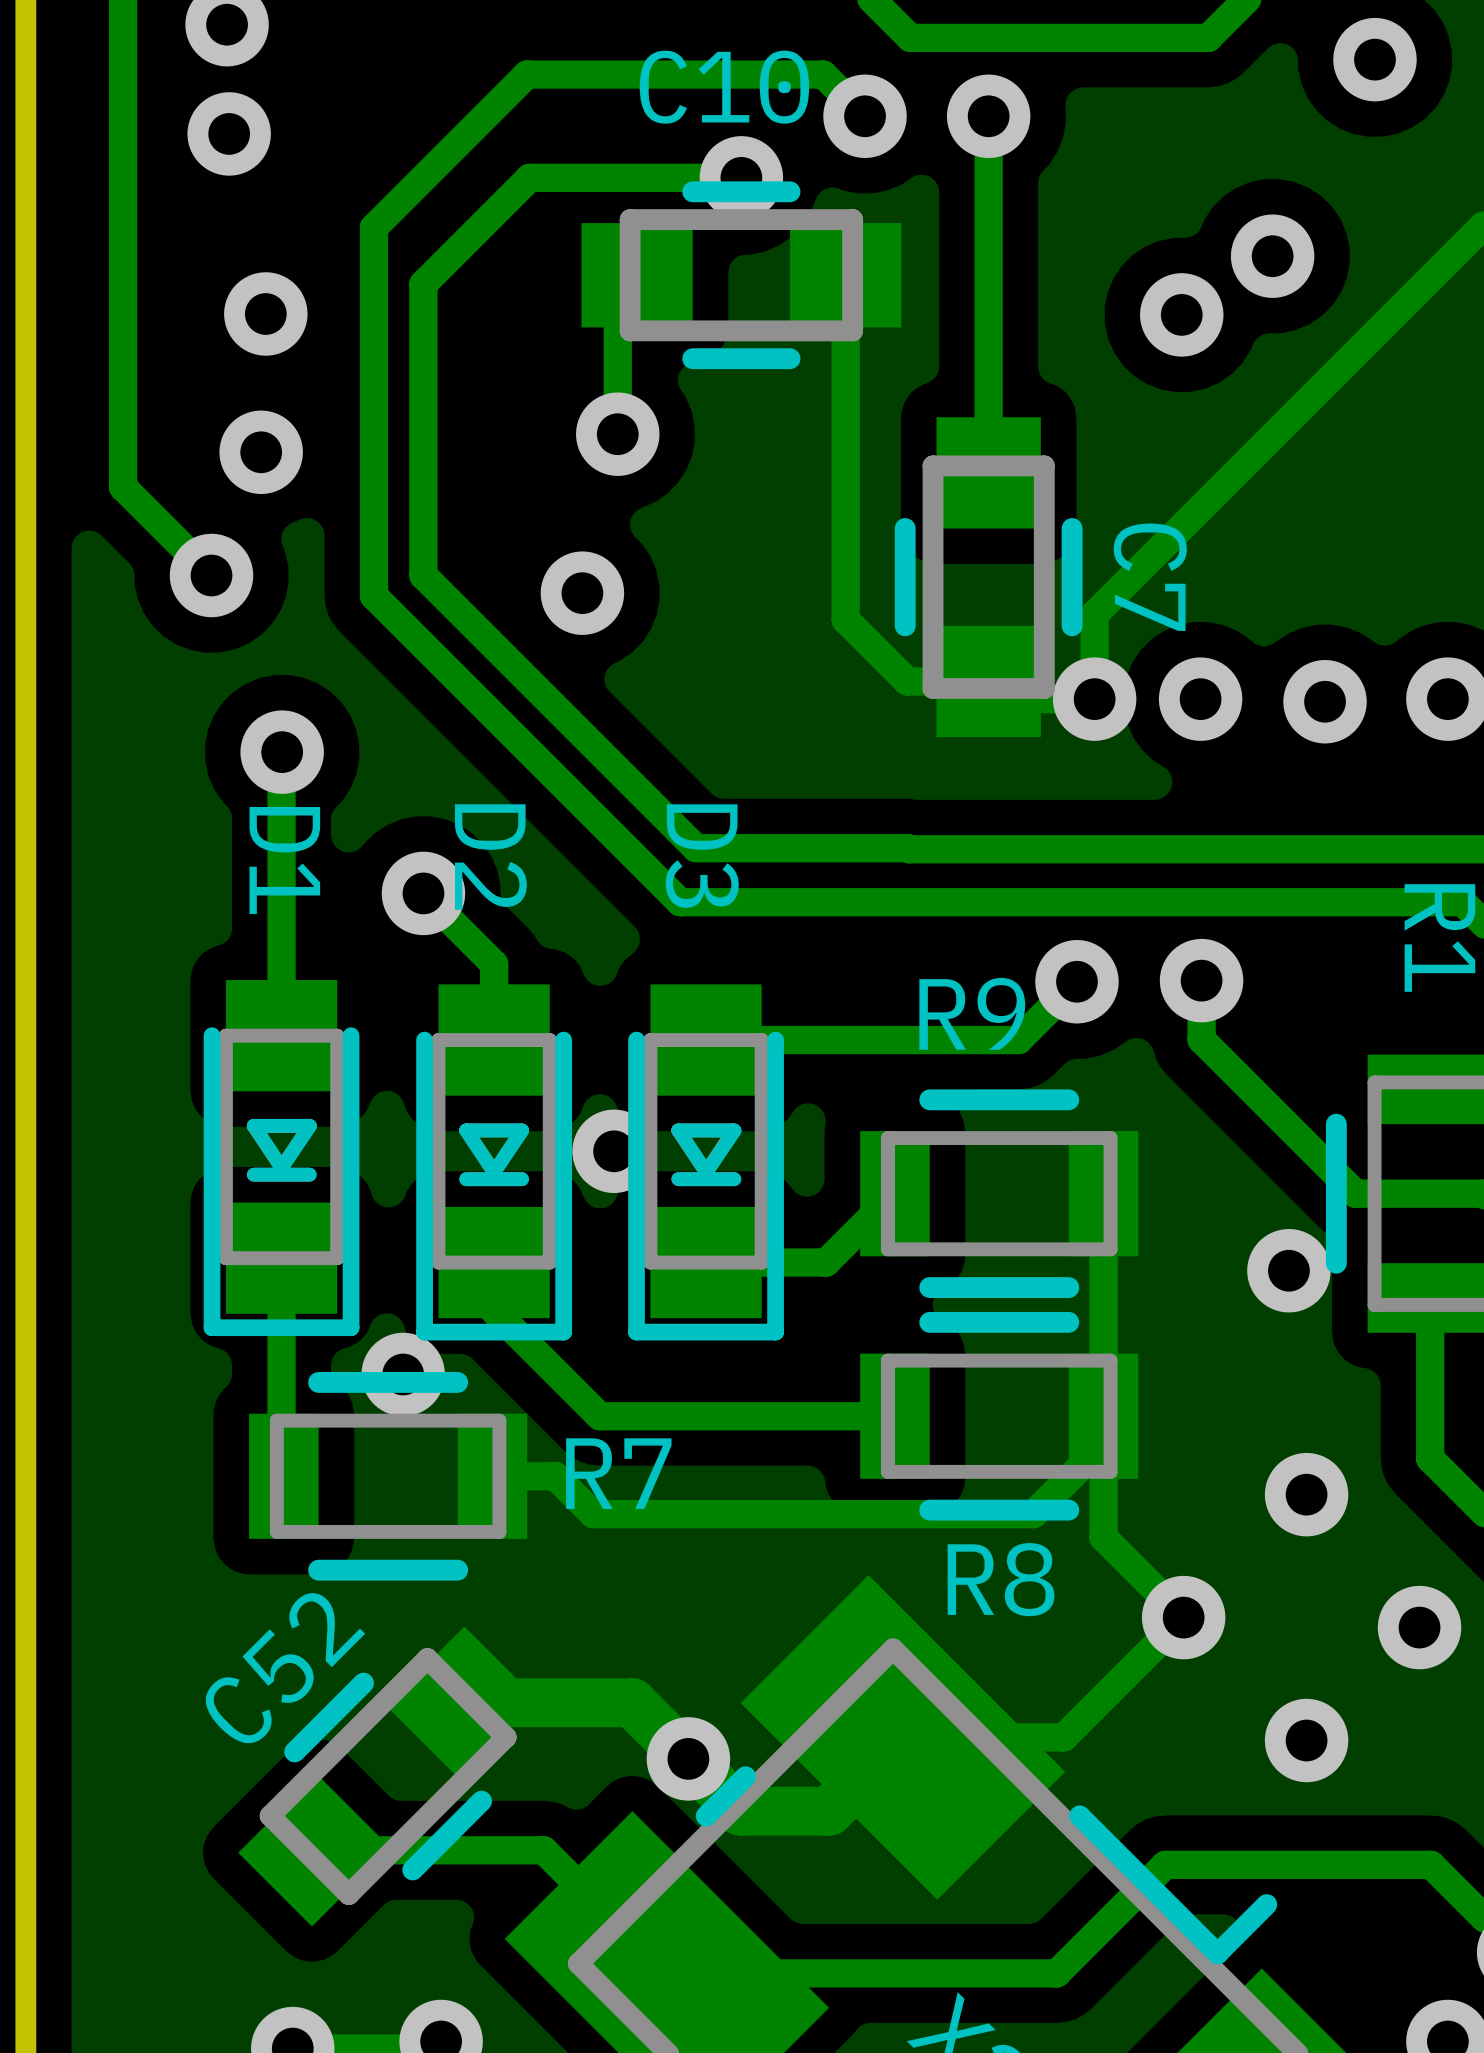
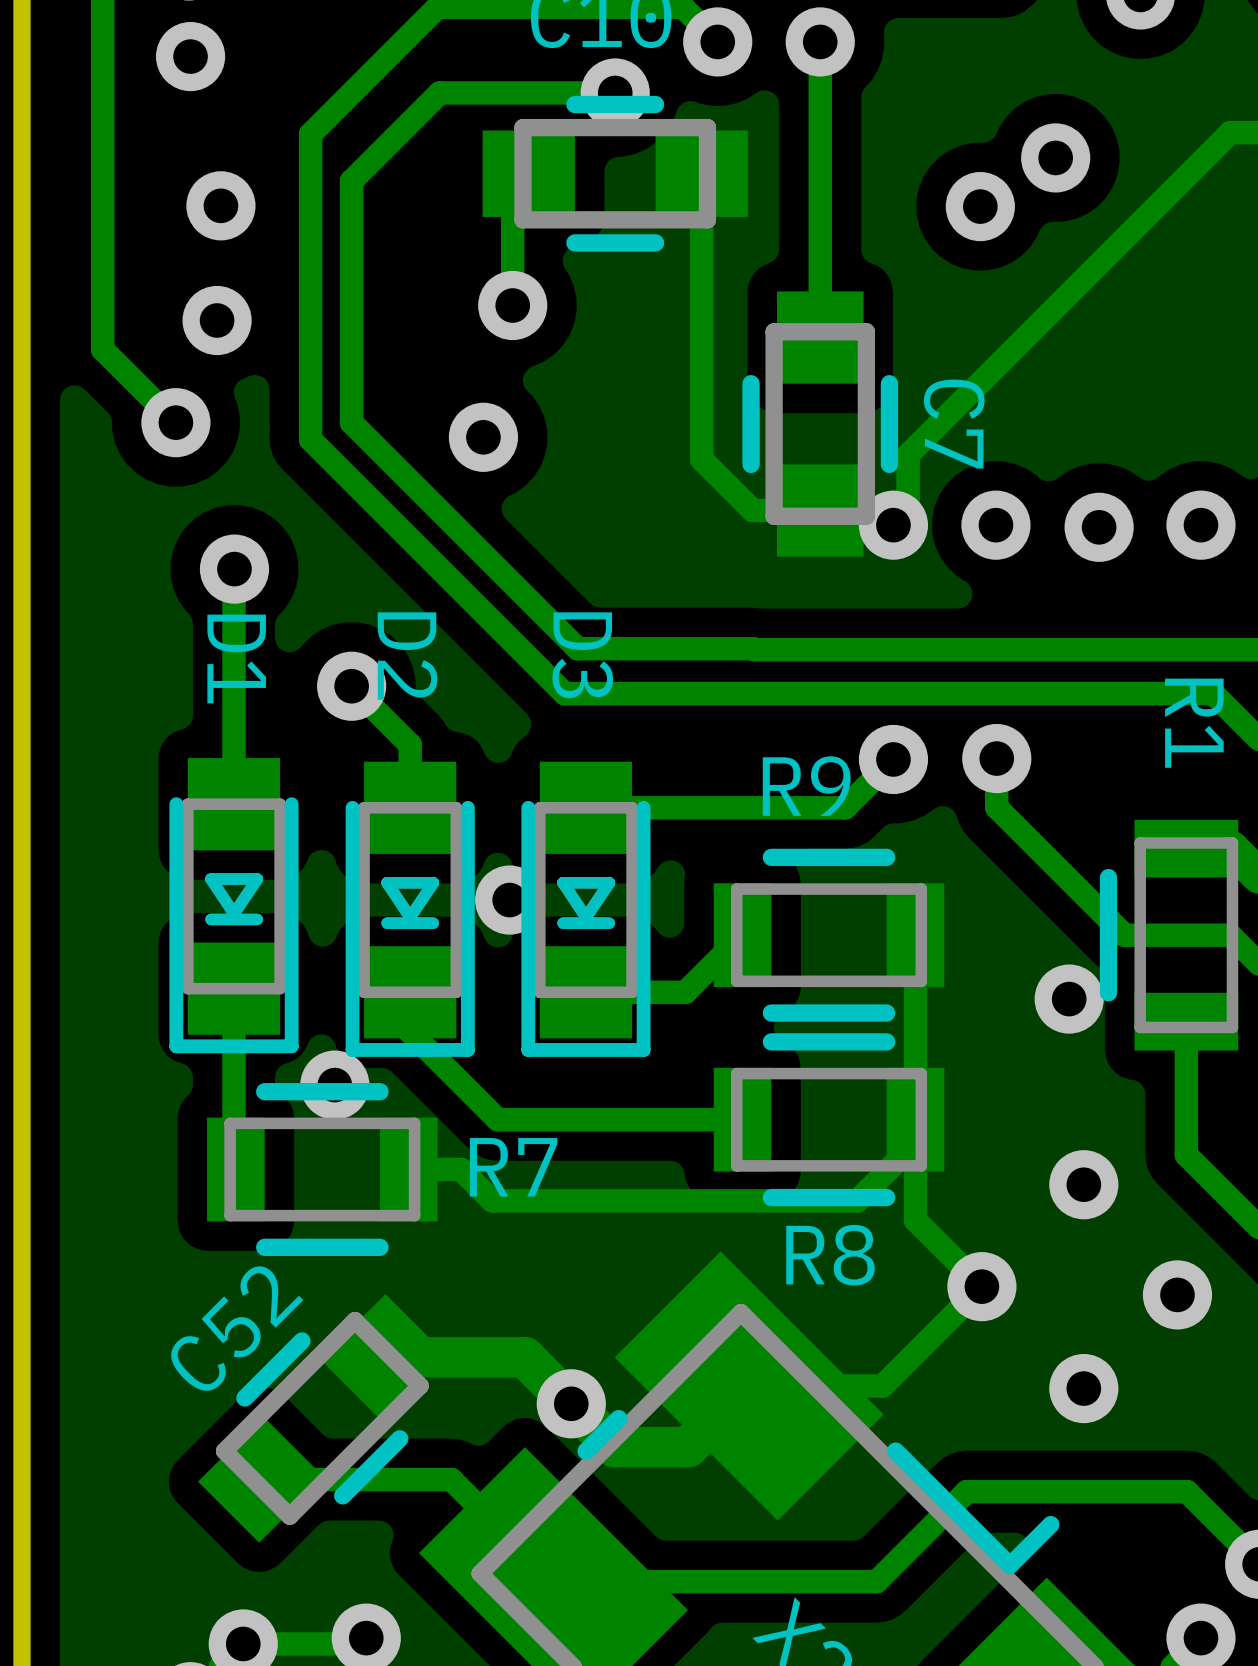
via position: (1094, 699) -> (893, 525)

